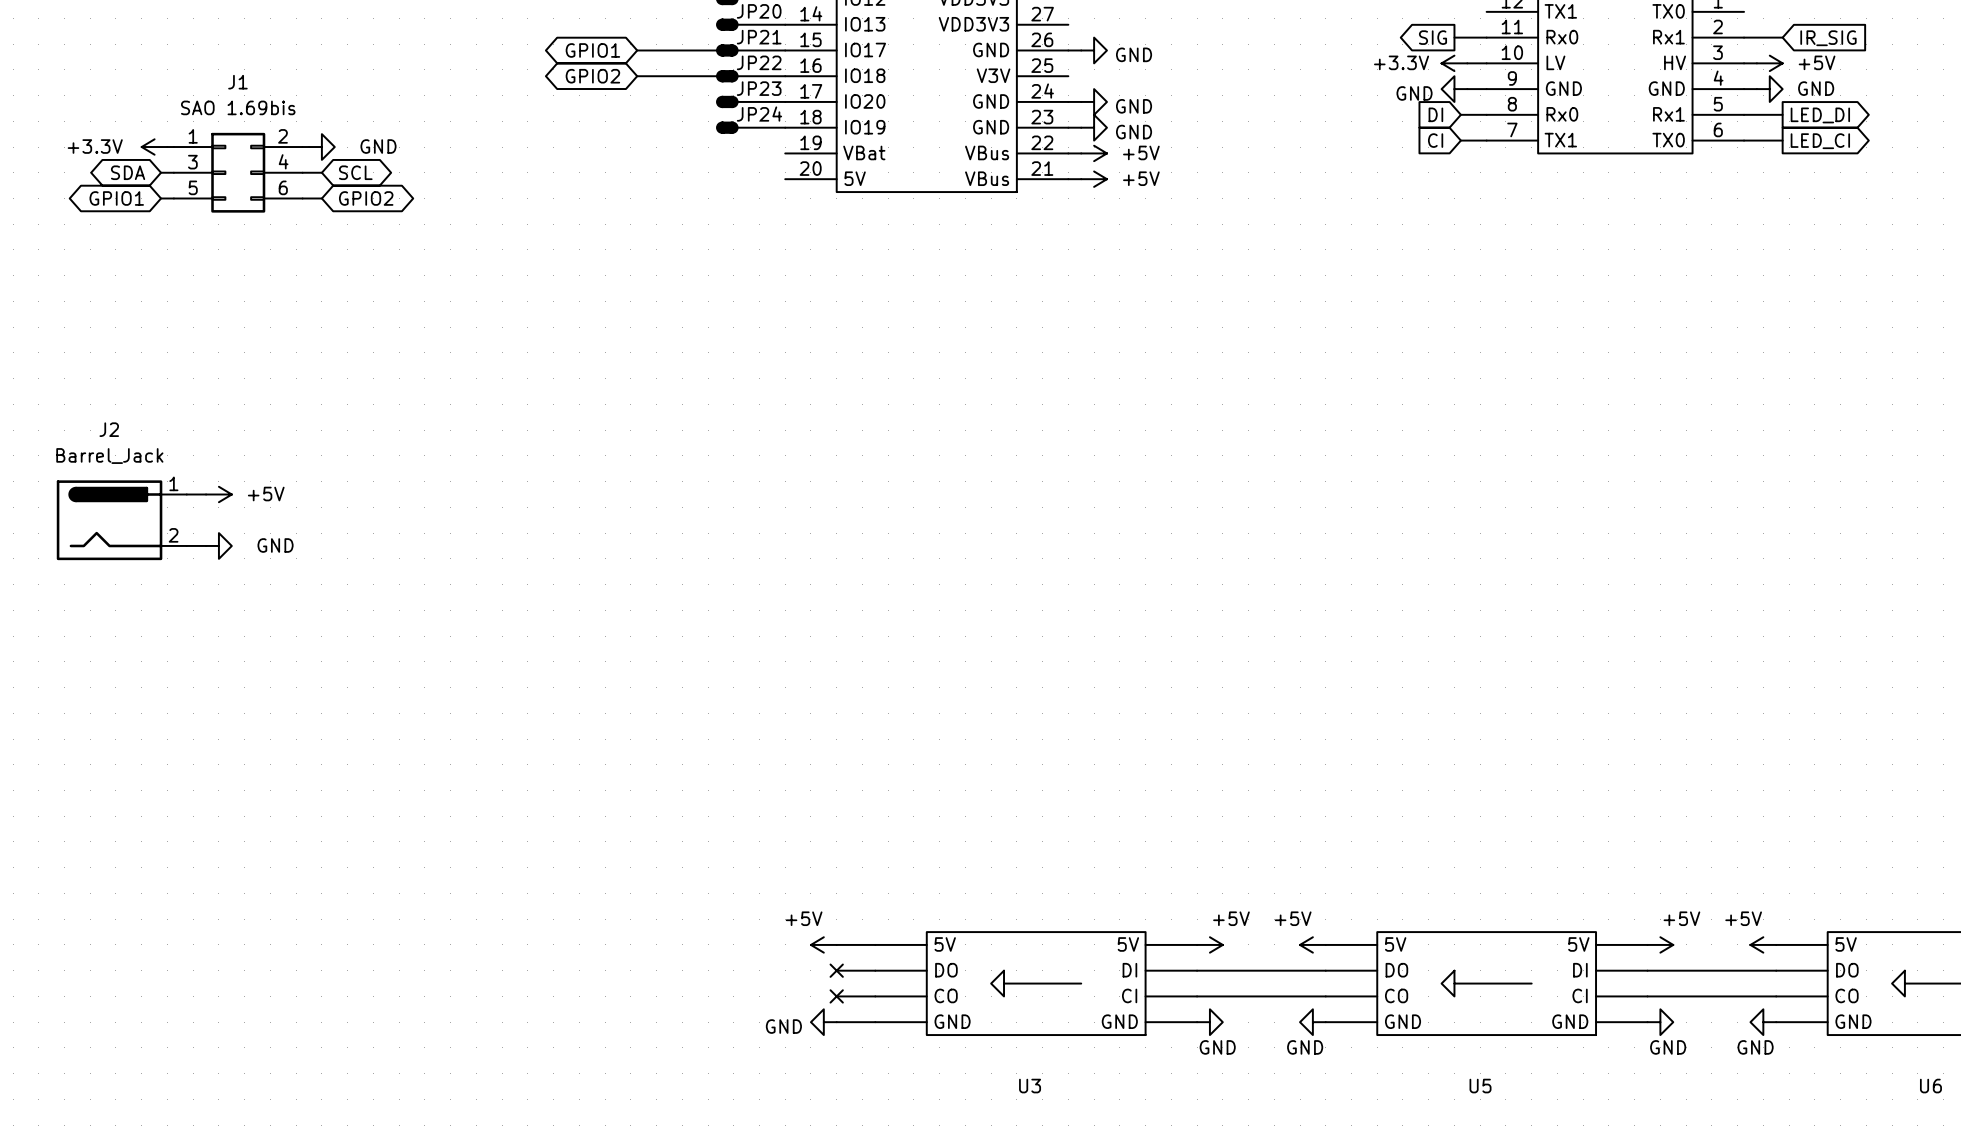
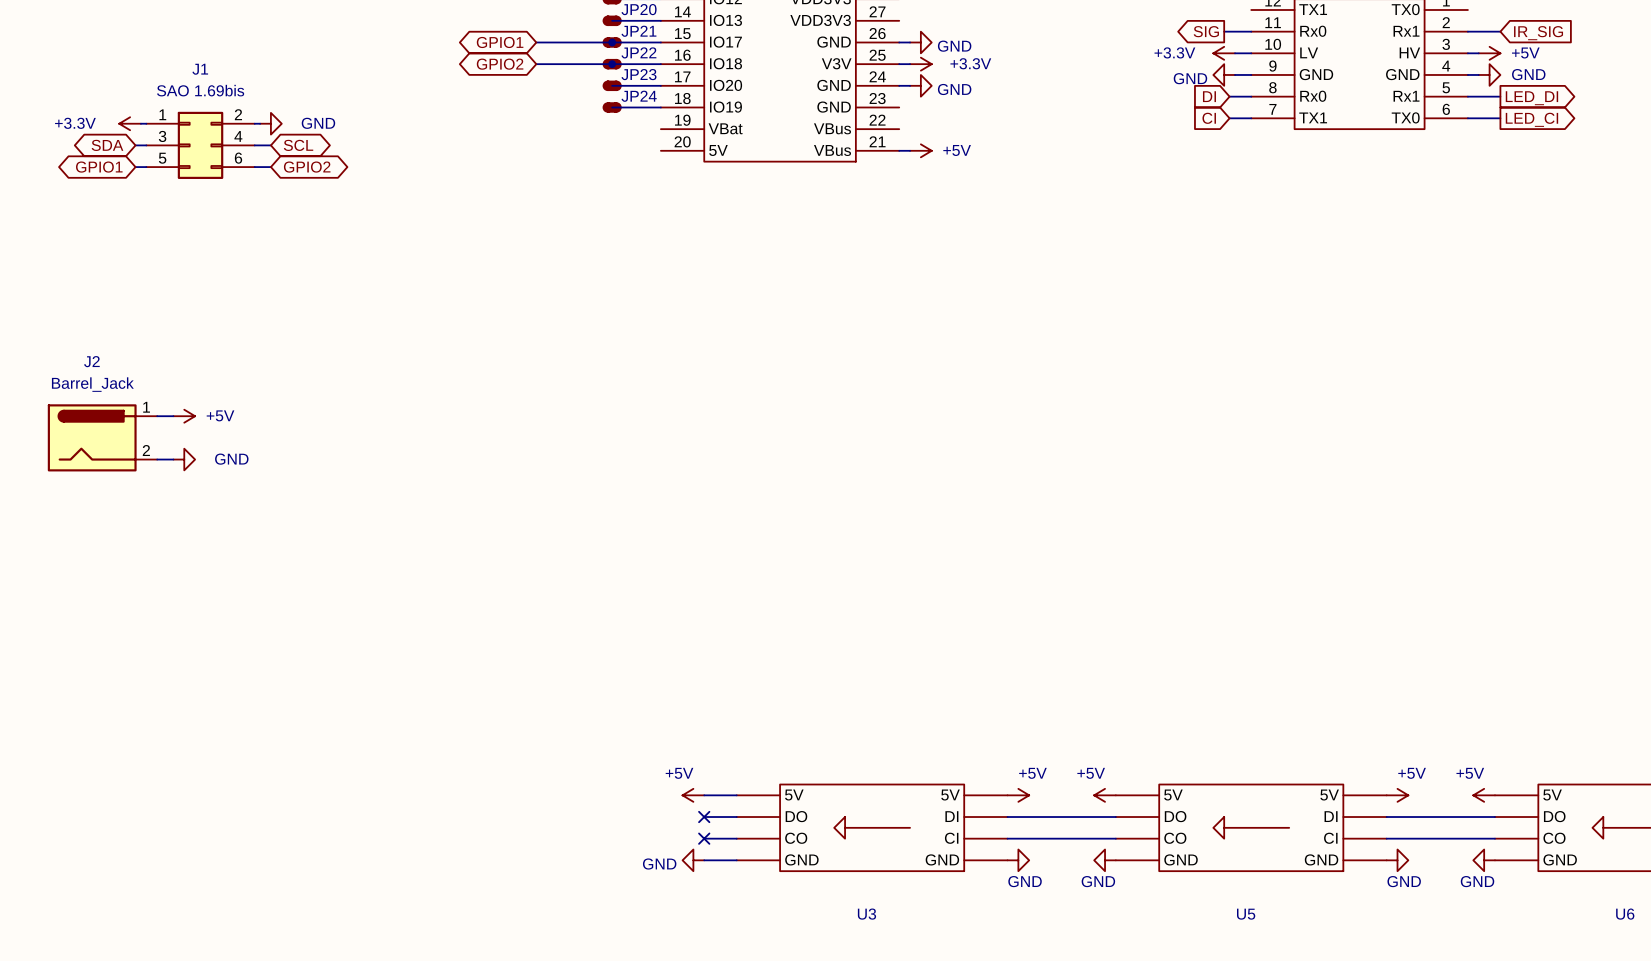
power symbol: none -> +3.3V (920, 64)
wire: (1068, 127) (1081, 127) -> (899, 64) (910, 64)
power symbol: GND (1094, 127) -> none
wire: (1068, 153) (1081, 153) -> none
power symbol: +5V (1094, 153) -> none

